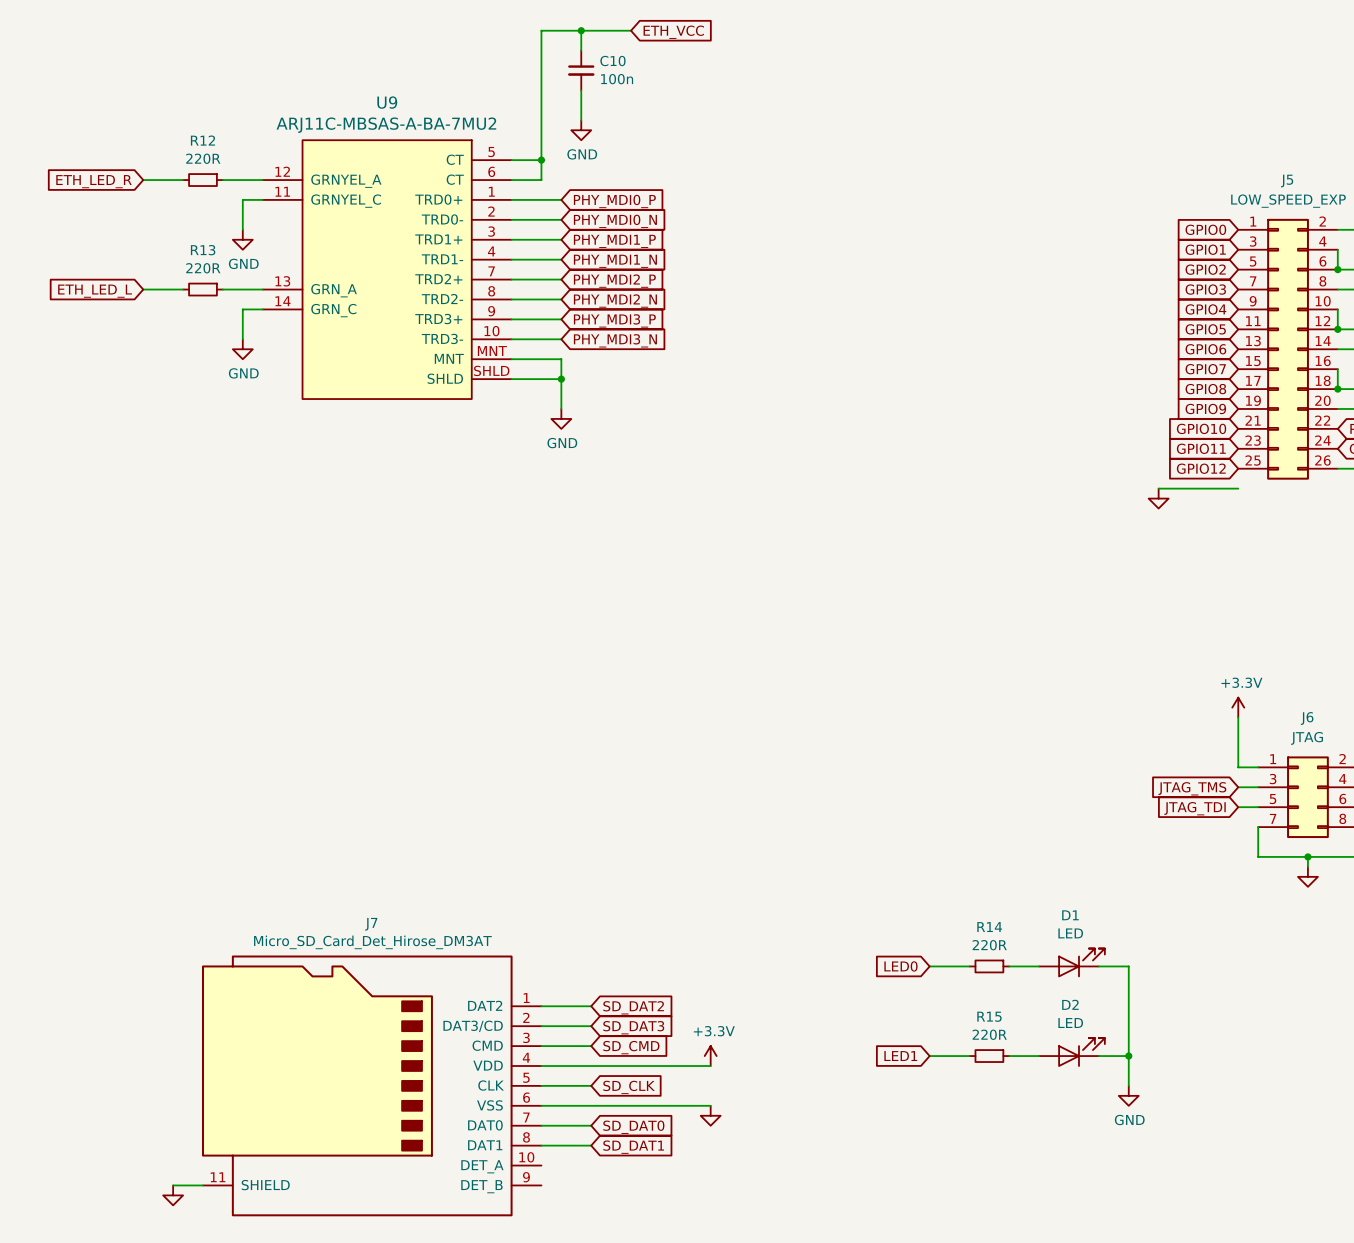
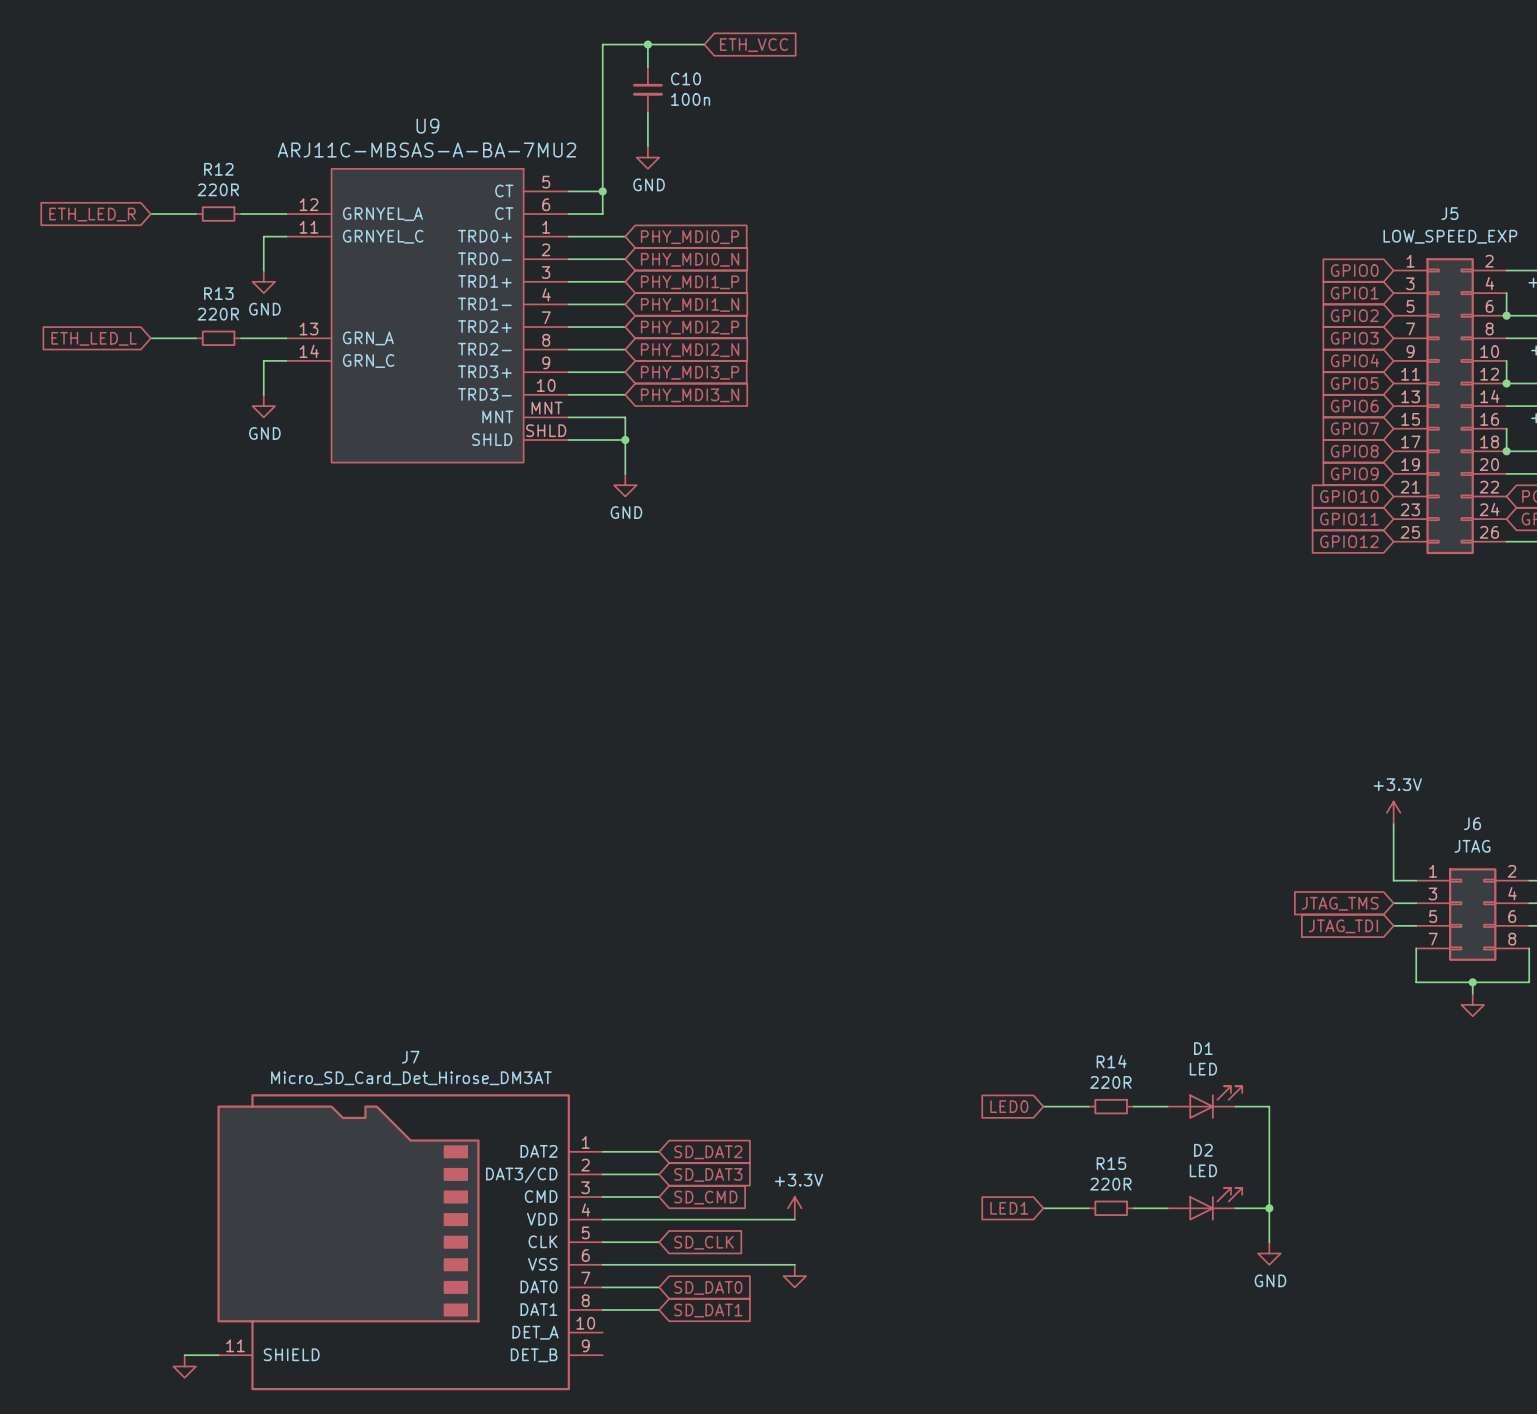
wire: (1158, 488) (1238, 488) -> none
power symbol: (1158, 498) -> none

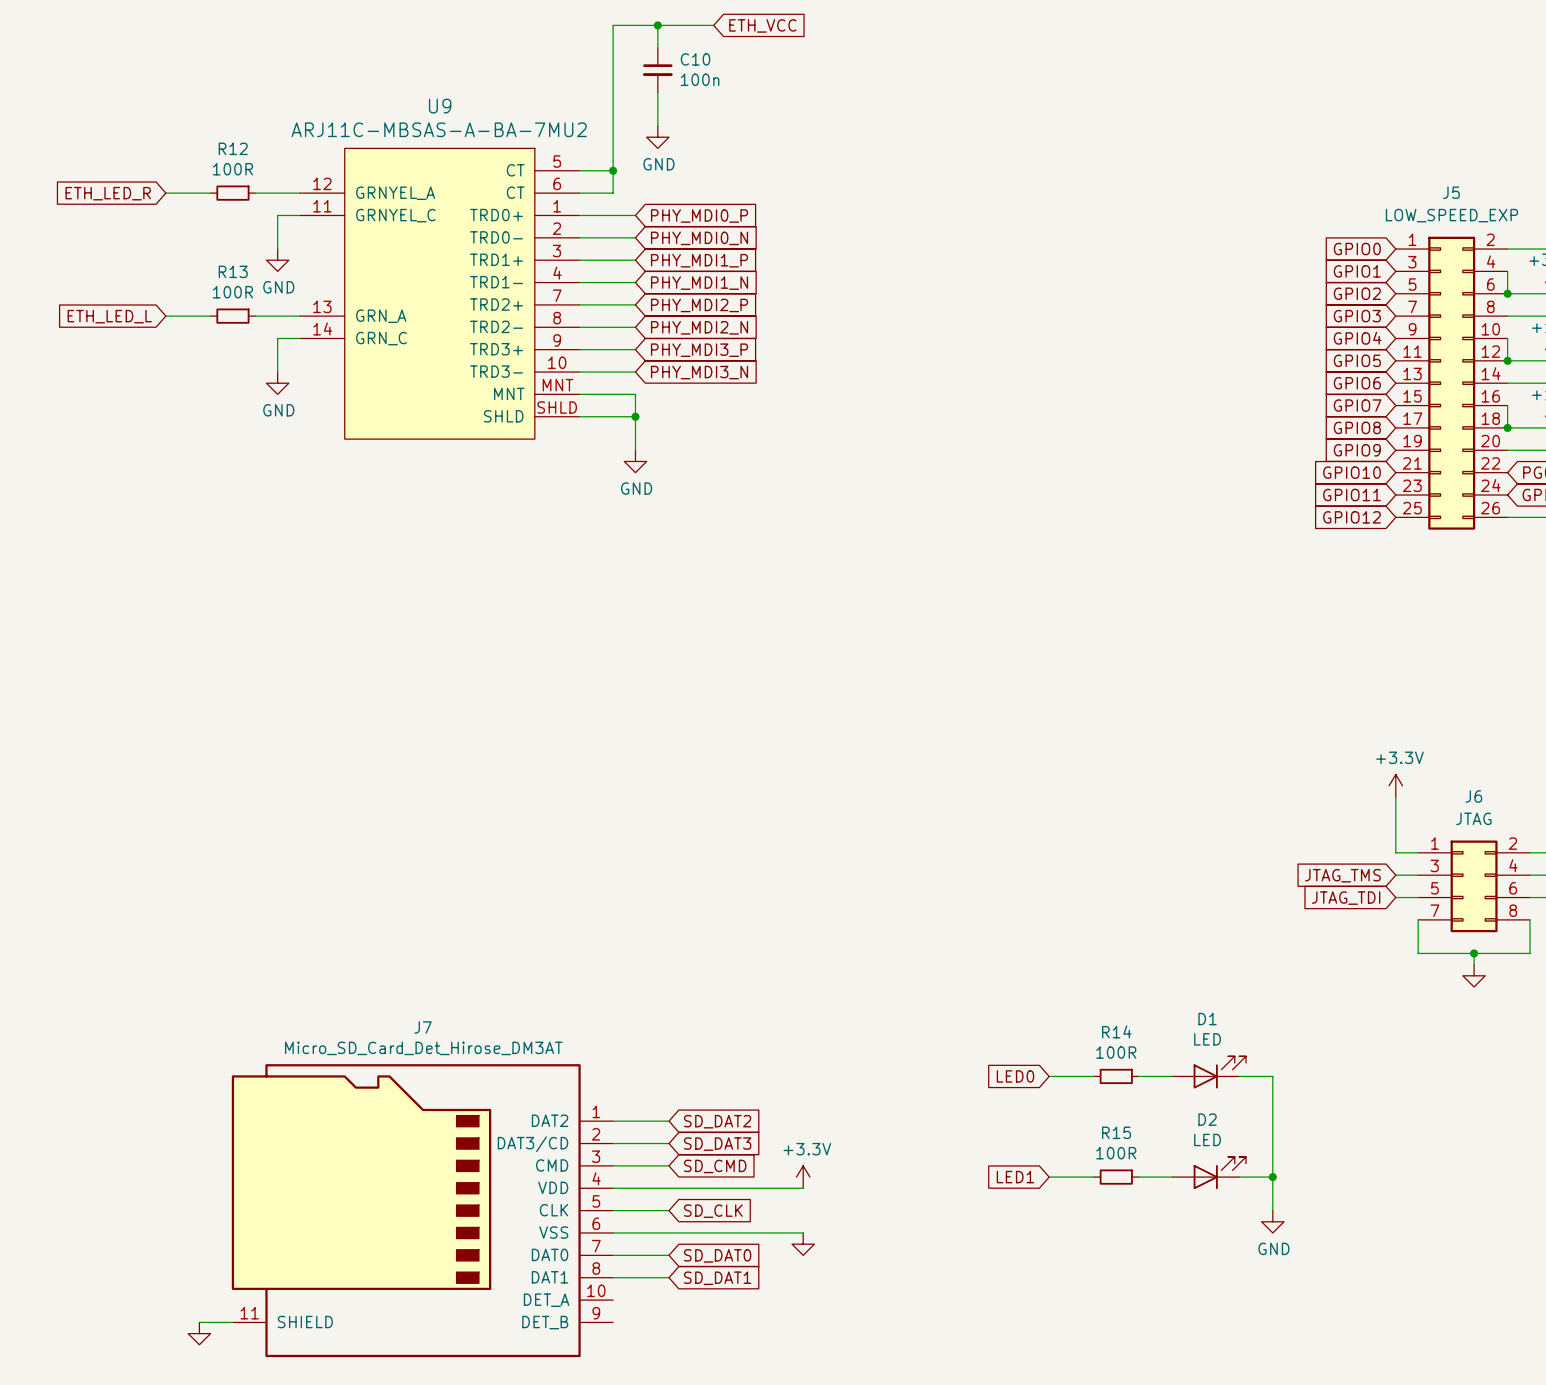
R12 value: 220R (218, 189) -> 100R (232, 169)
R13 value: 220R (218, 314) -> 100R (232, 292)
R14 value: 220R (1110, 1082) -> 100R (1116, 1052)
R15 value: 220R (1110, 1184) -> 100R (1116, 1153)

